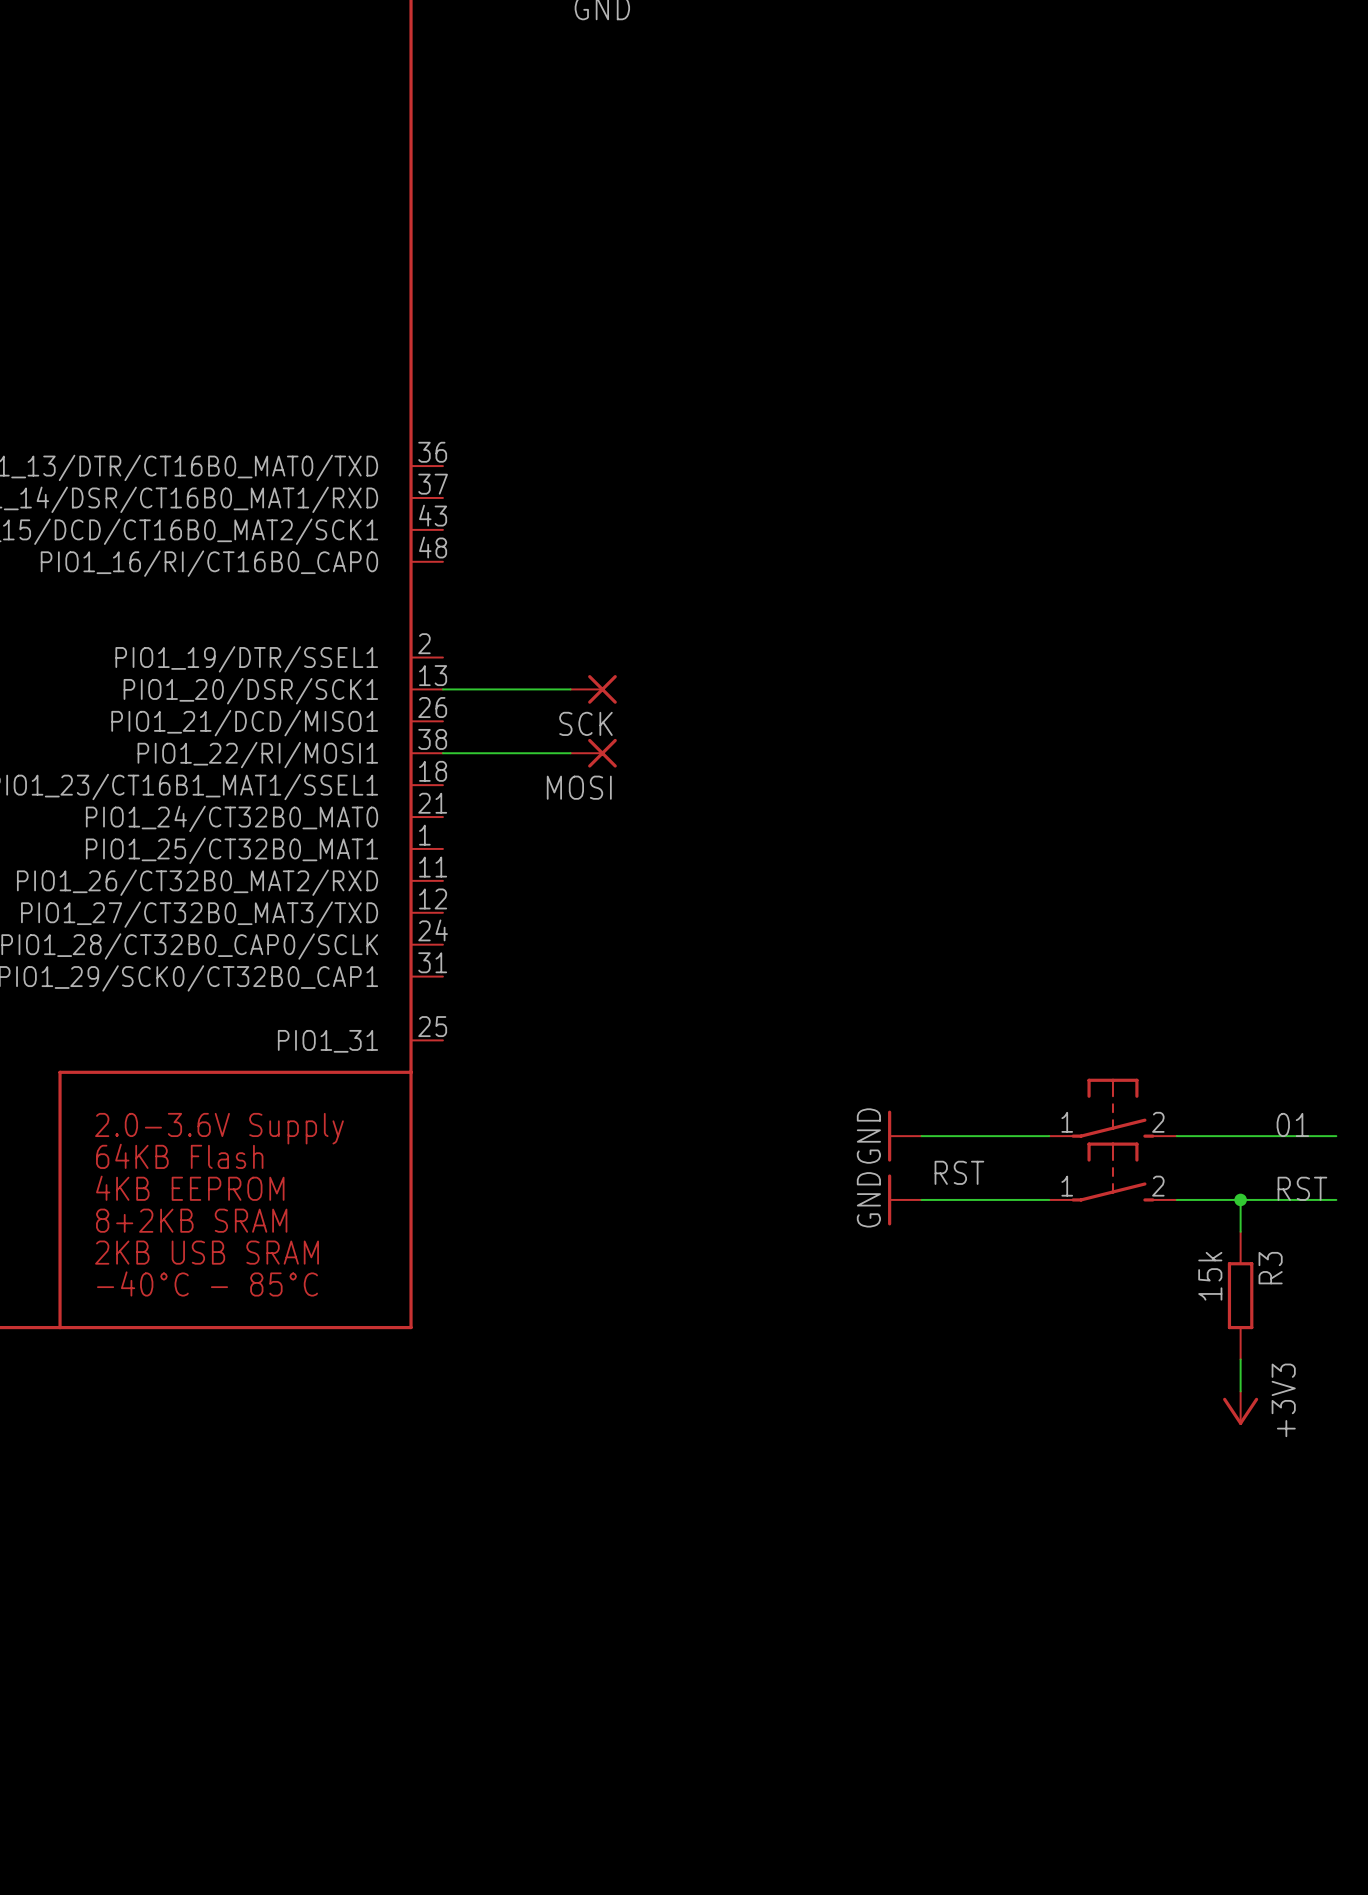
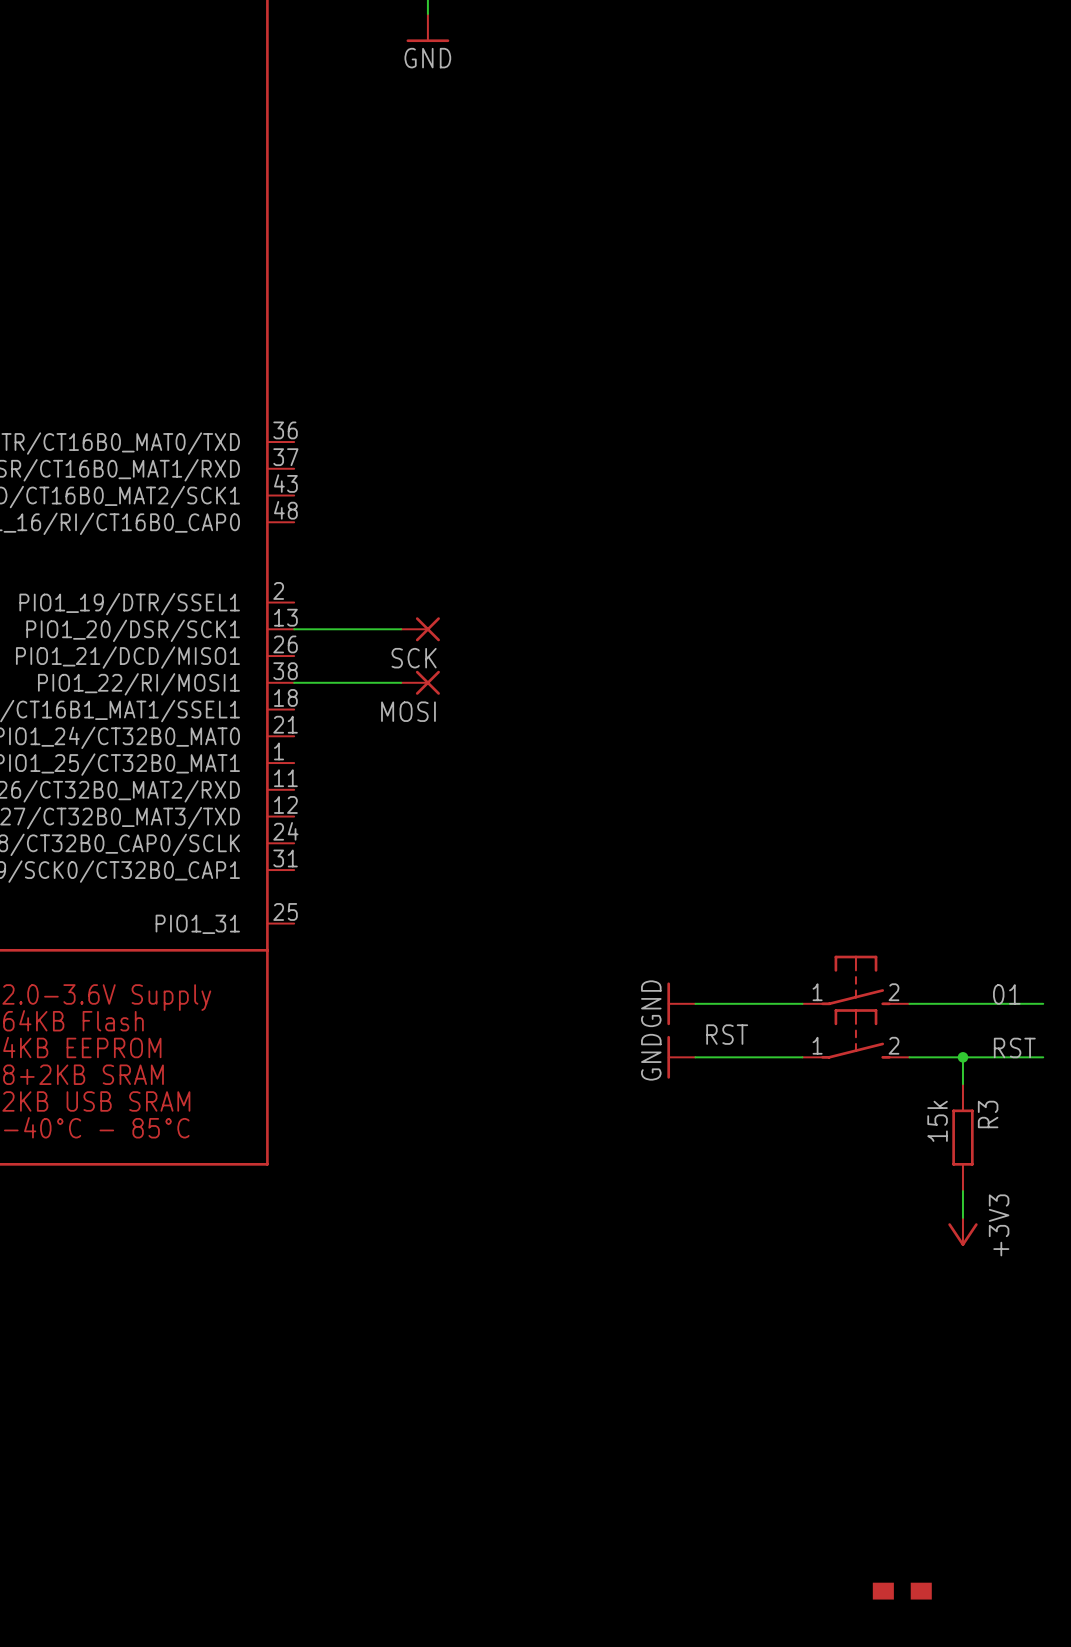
part: none -> (902, 1591)

